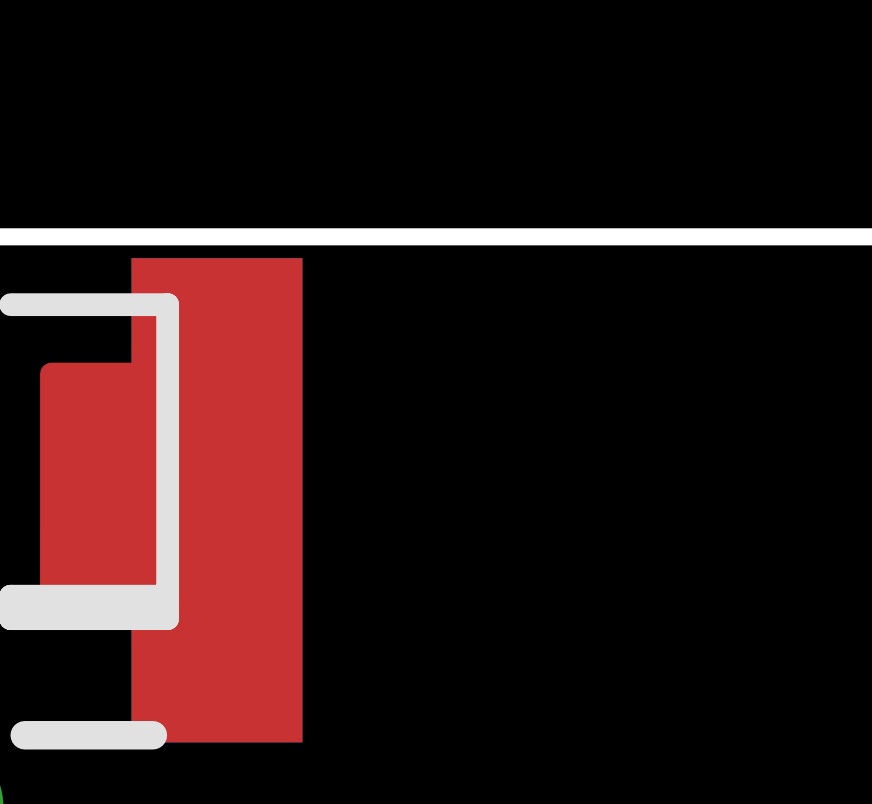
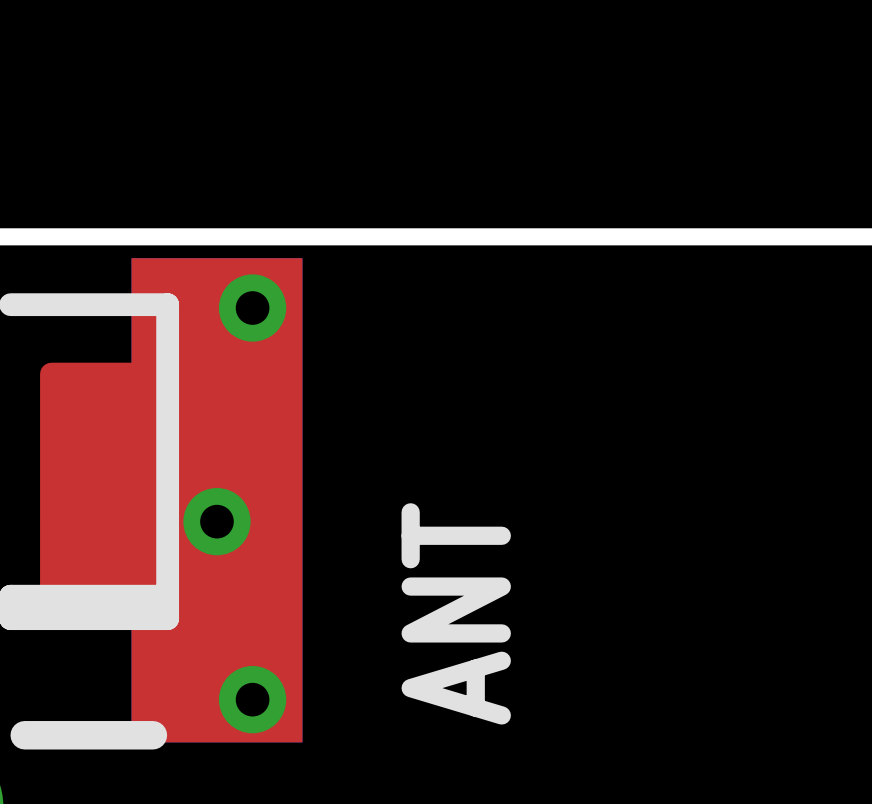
via: none -> (252, 308)
via: none -> (216, 521)
text: none -> ANT (456, 613)
via: none -> (252, 699)

